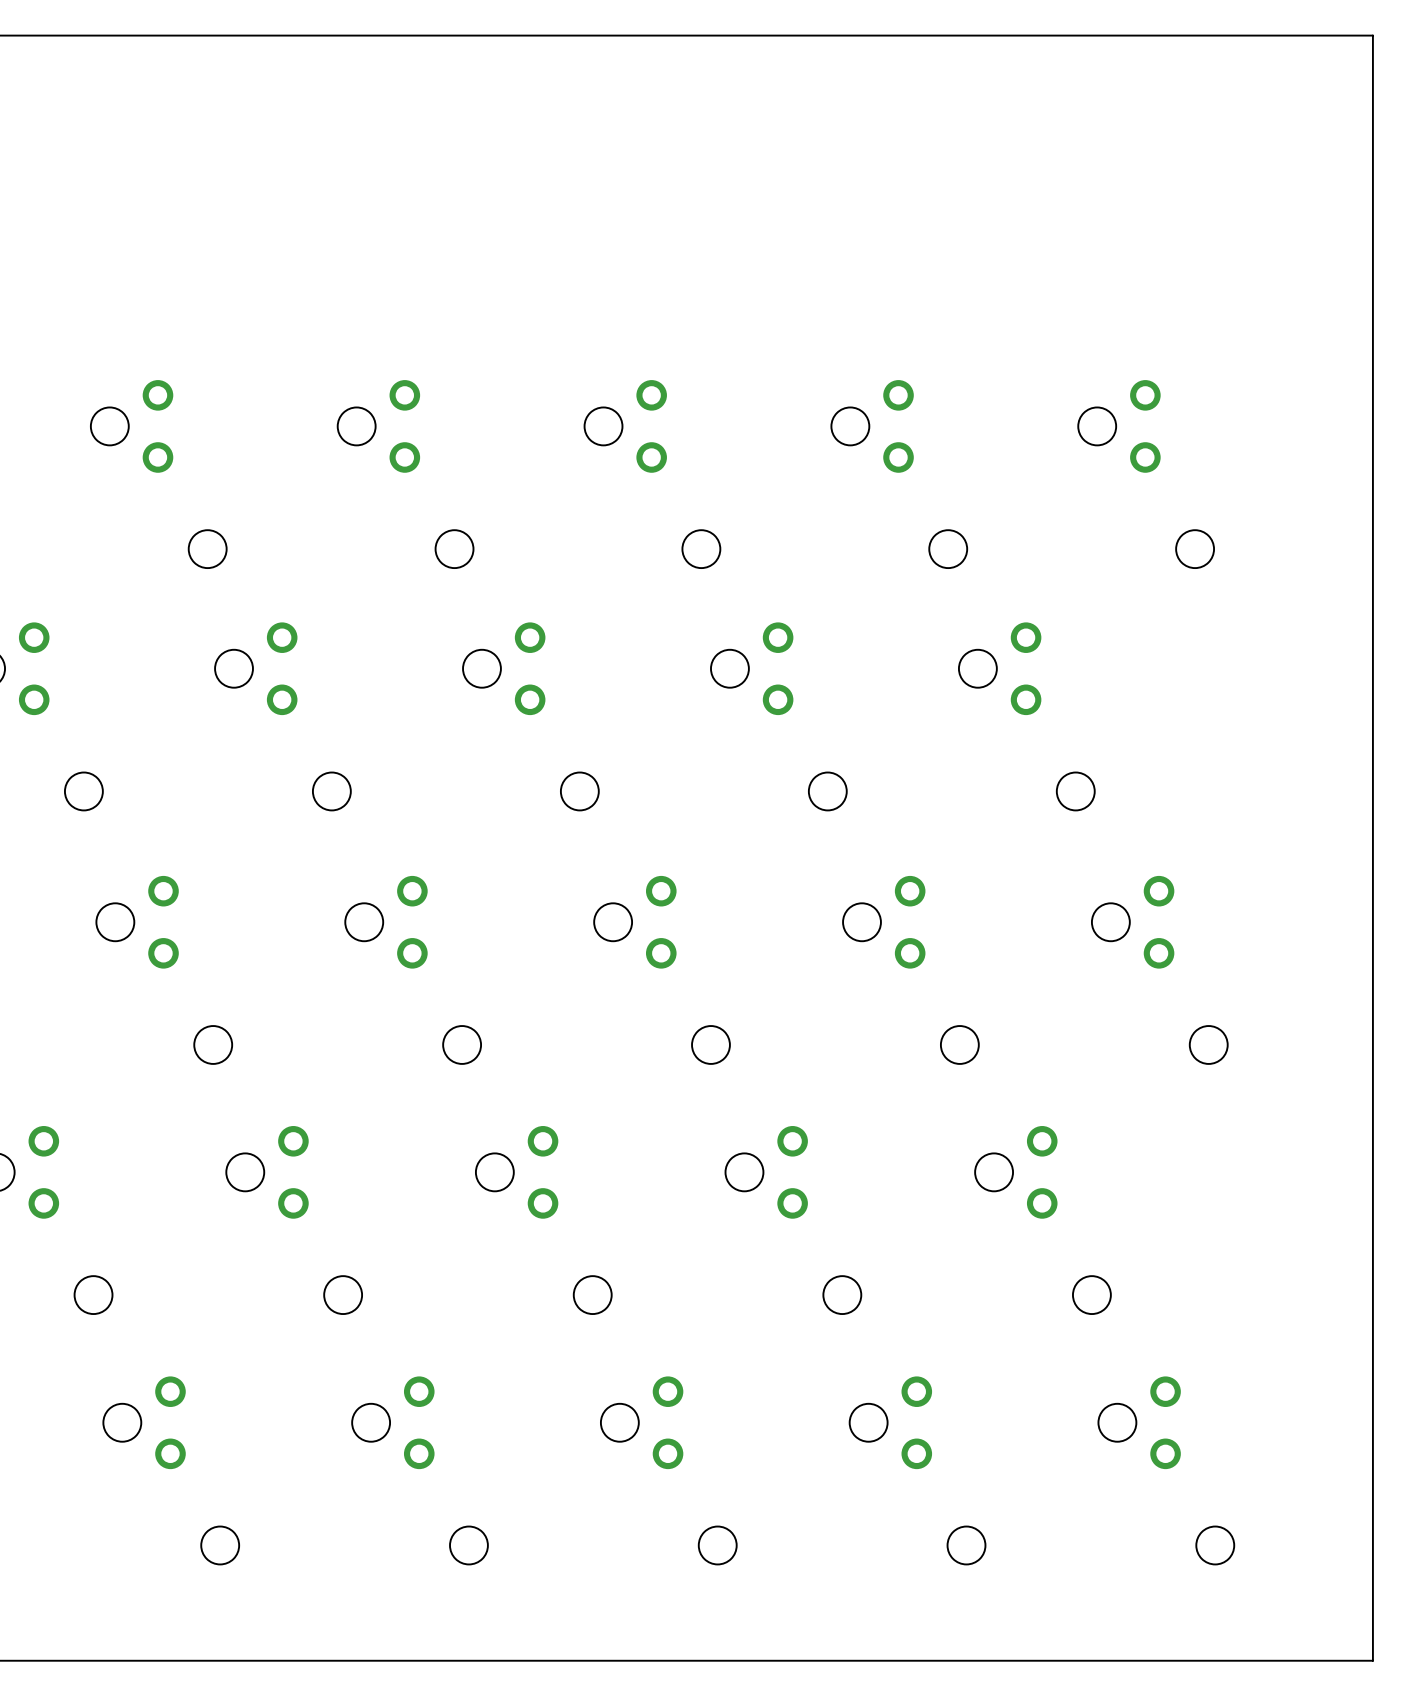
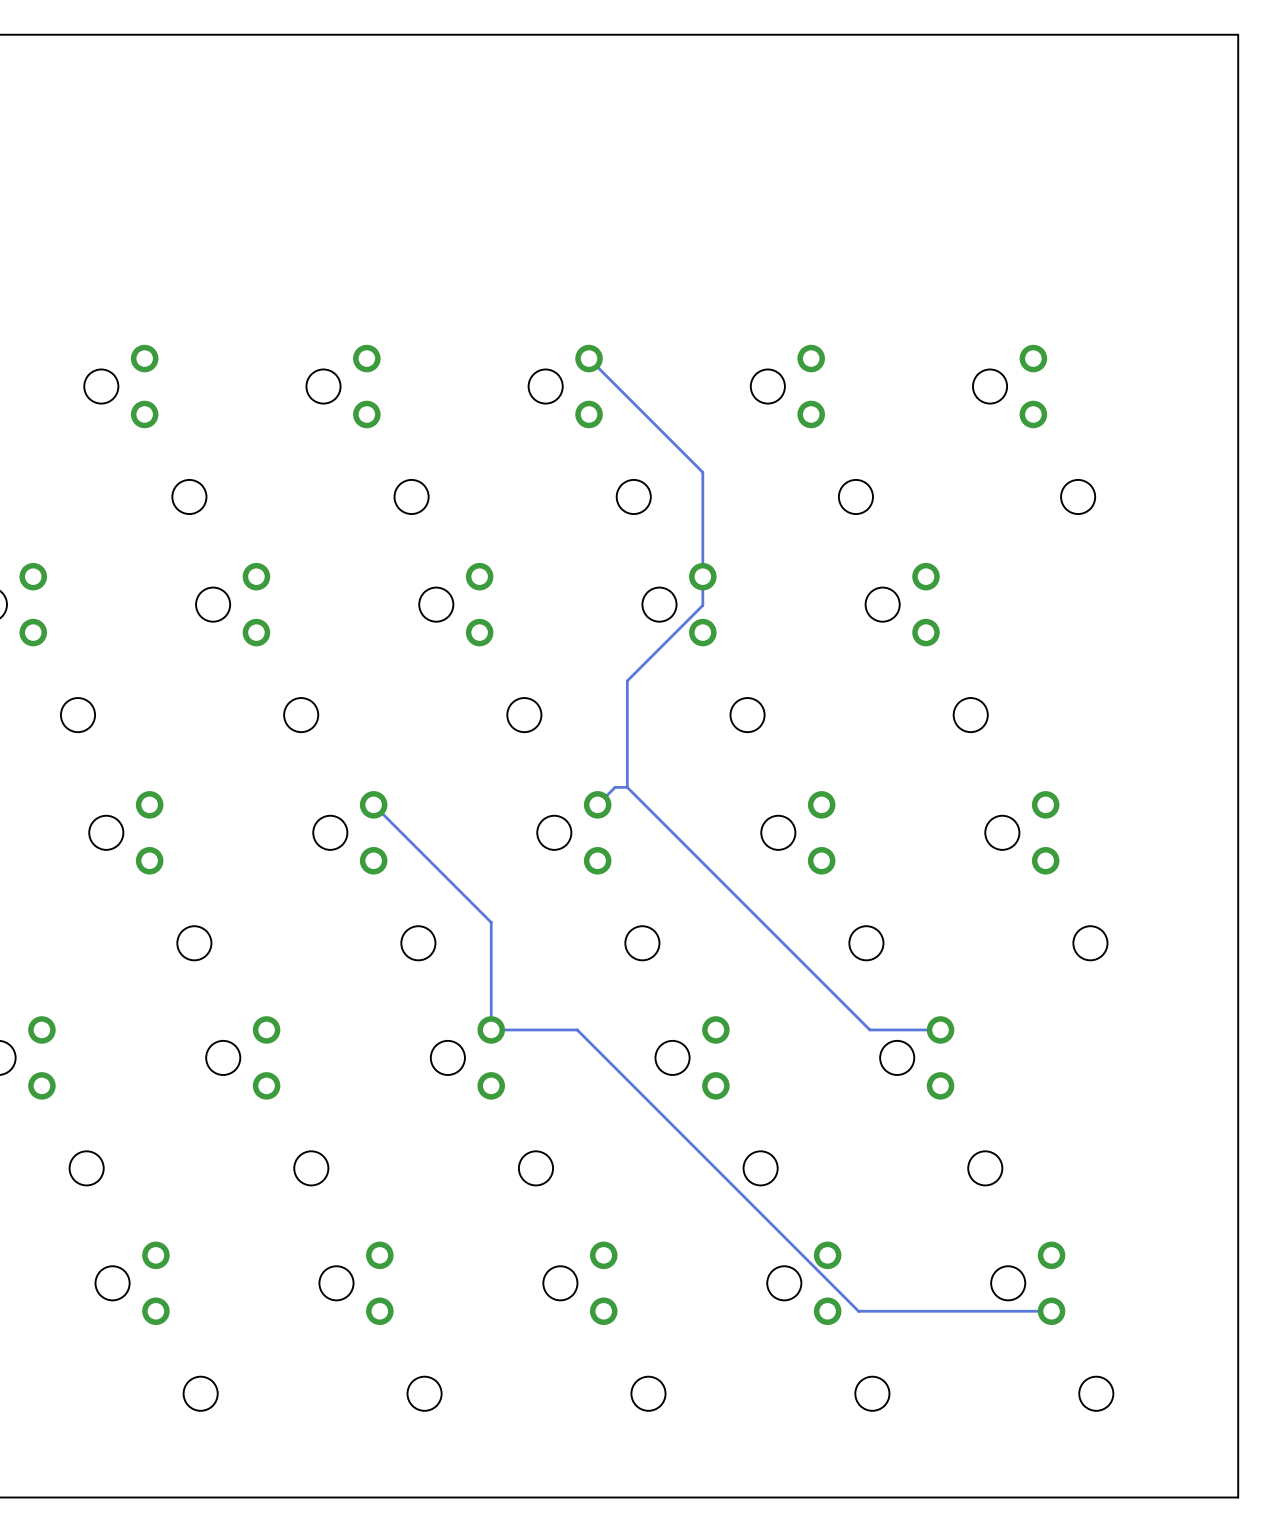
track: none -> (589, 358) (702, 472) (702, 605) (627, 680) (627, 787)
track: none -> (627, 787) (615, 787) (597, 804)
track: none -> (627, 787) (869, 1029) (940, 1029)
track: none -> (373, 804) (491, 922) (491, 1029) (577, 1029) (858, 1311) (1051, 1311)

